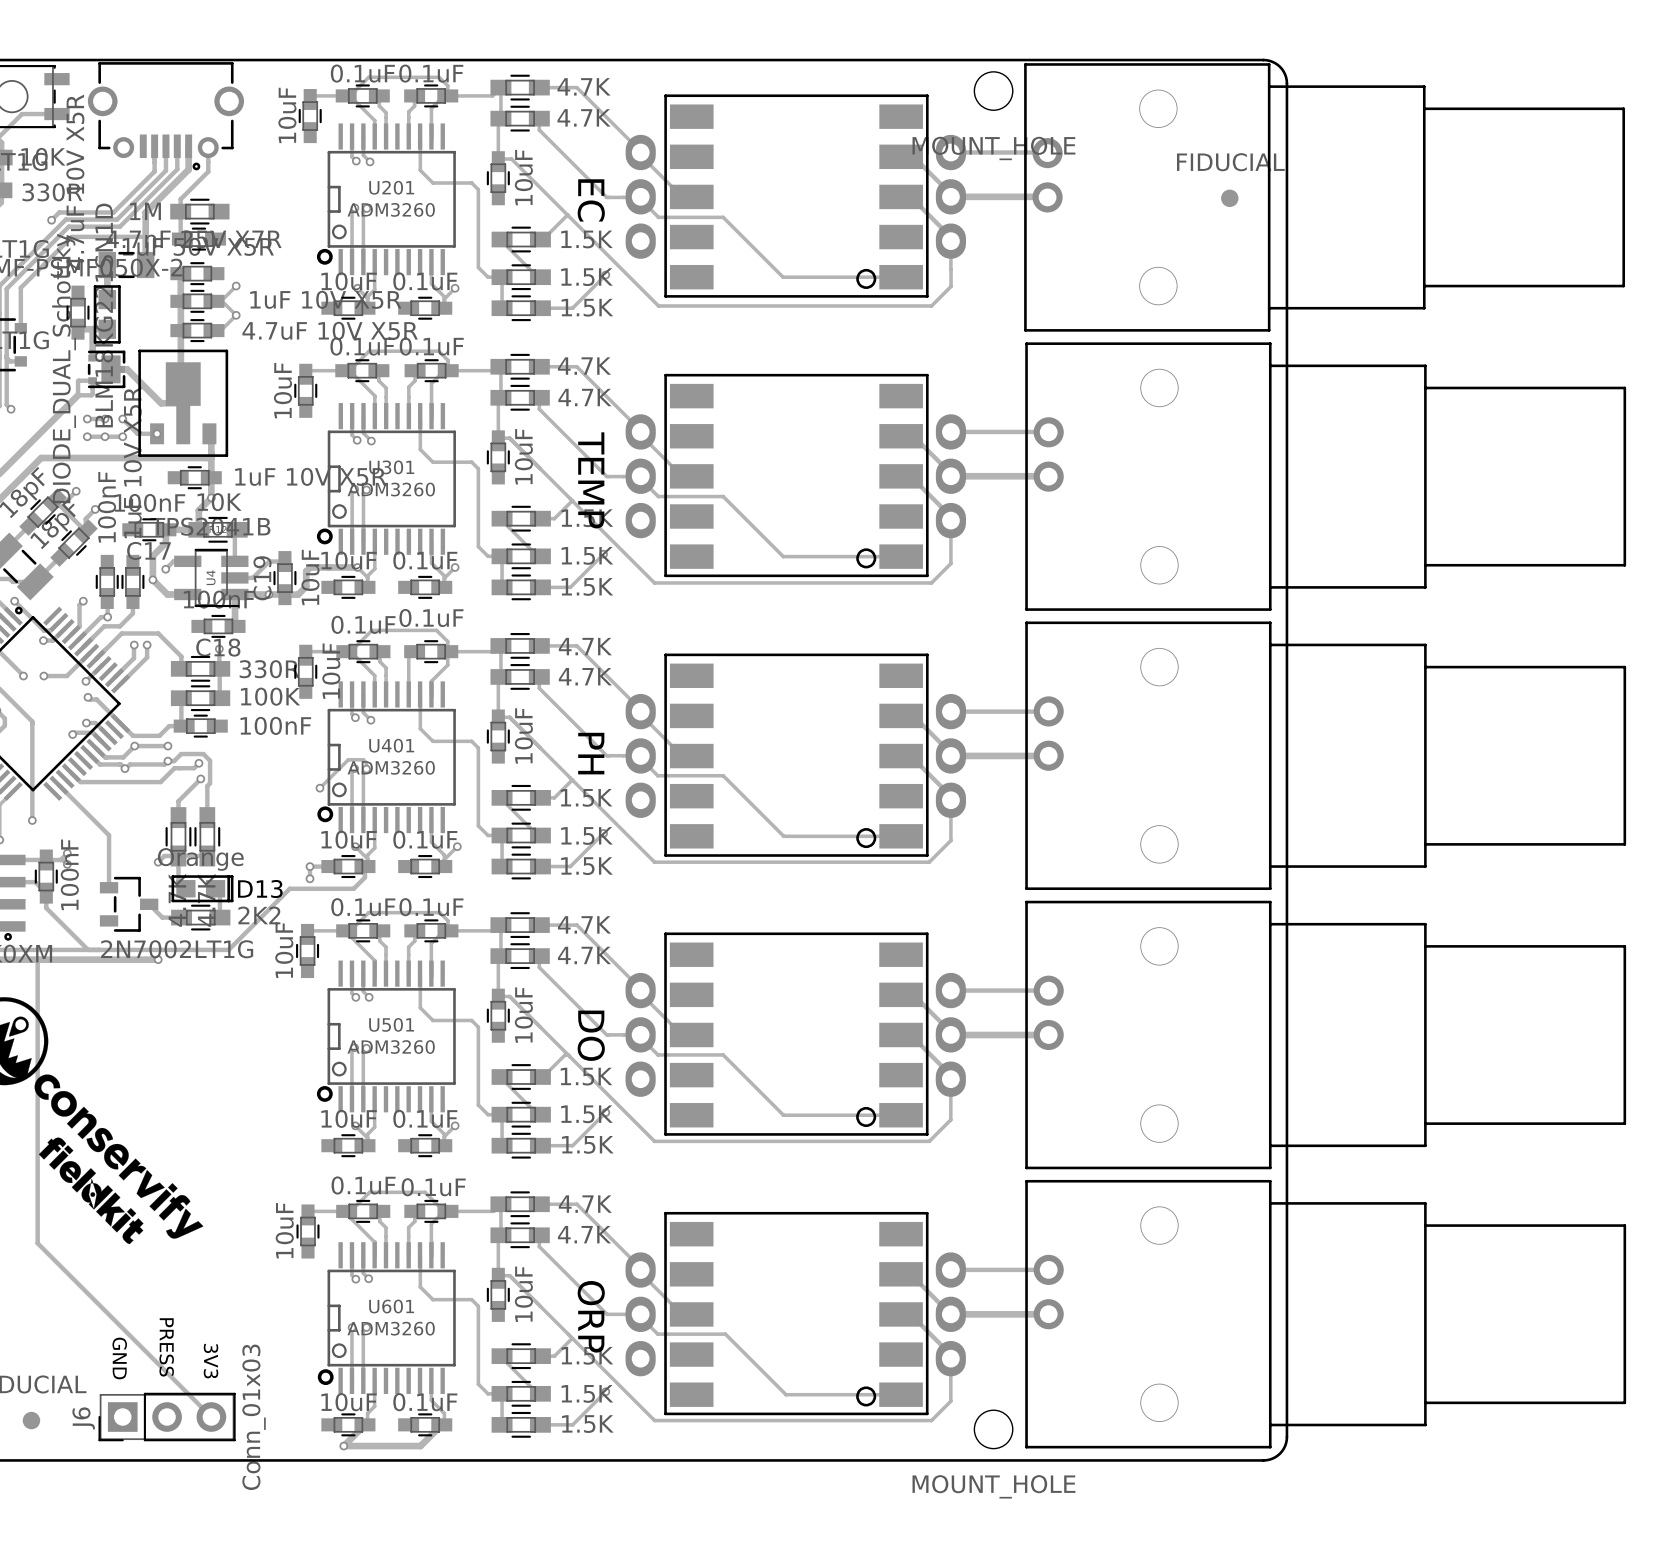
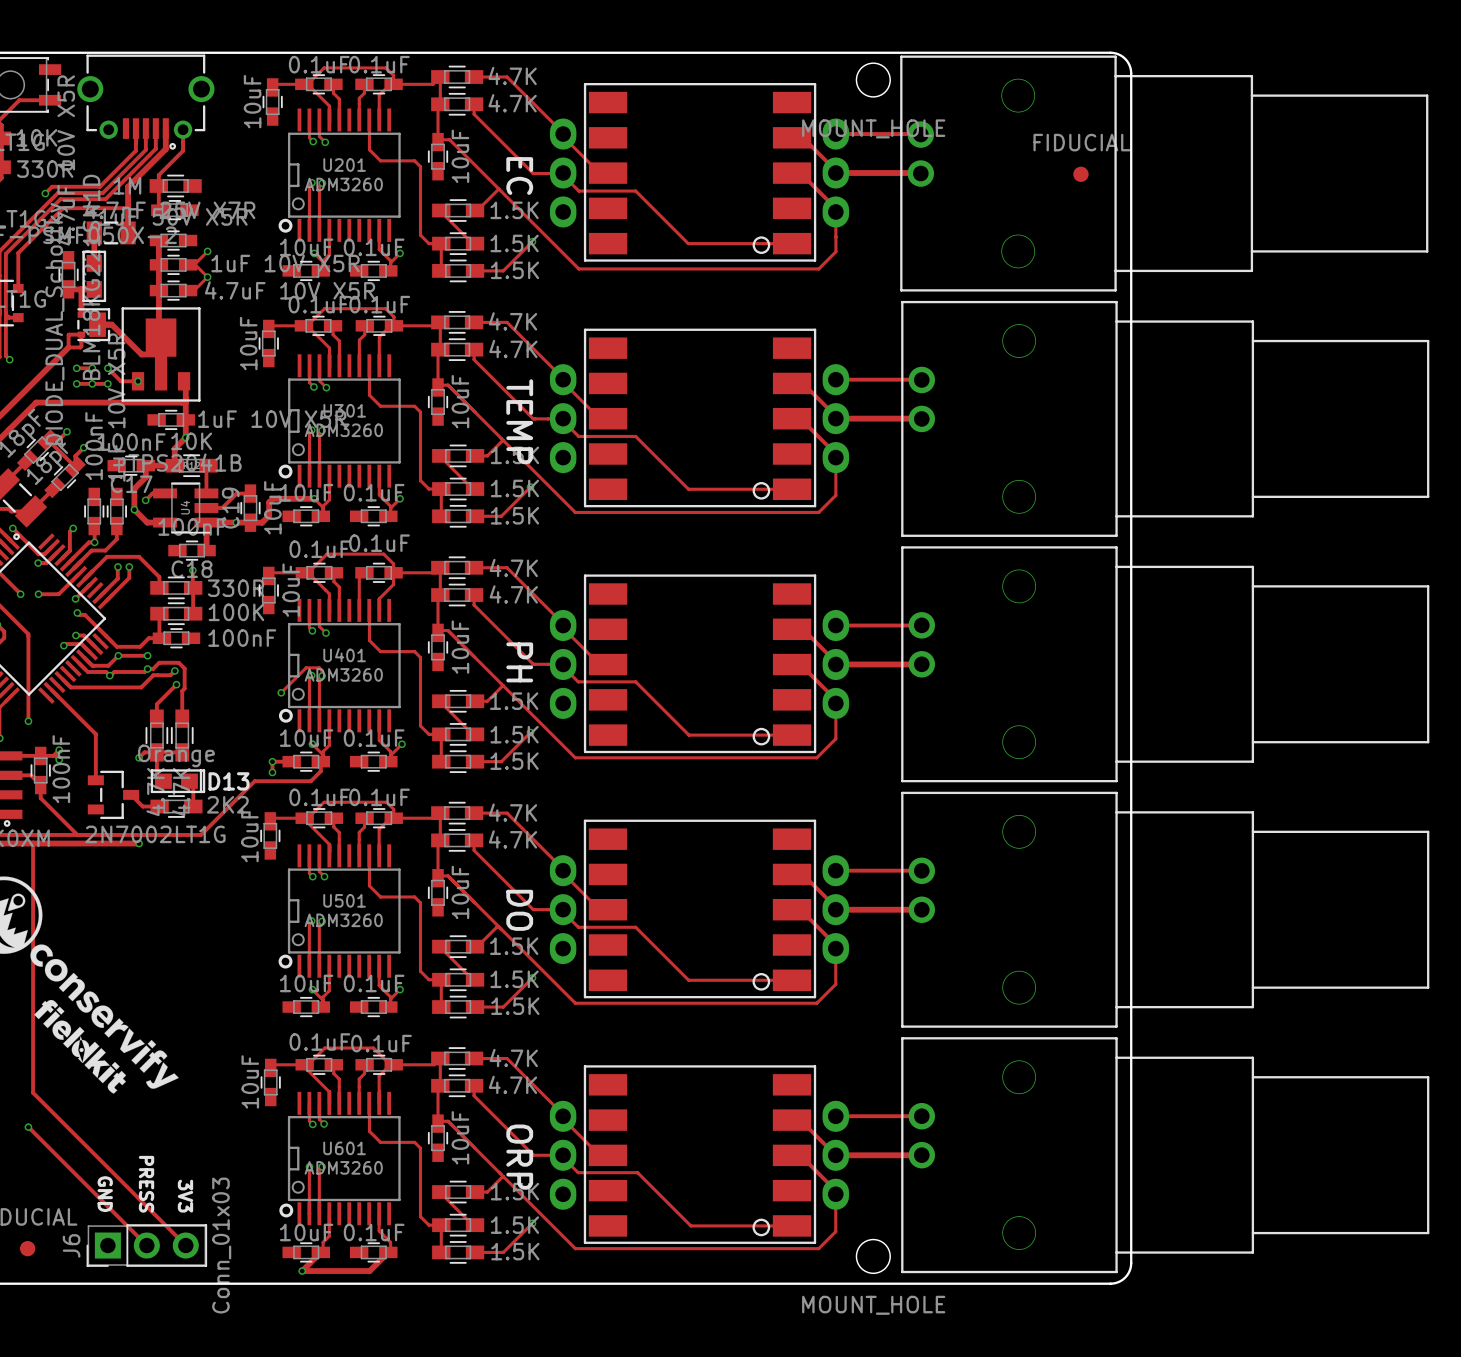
track: none -> (28, 1127) (146, 1245)
via: none -> (28, 1127)

